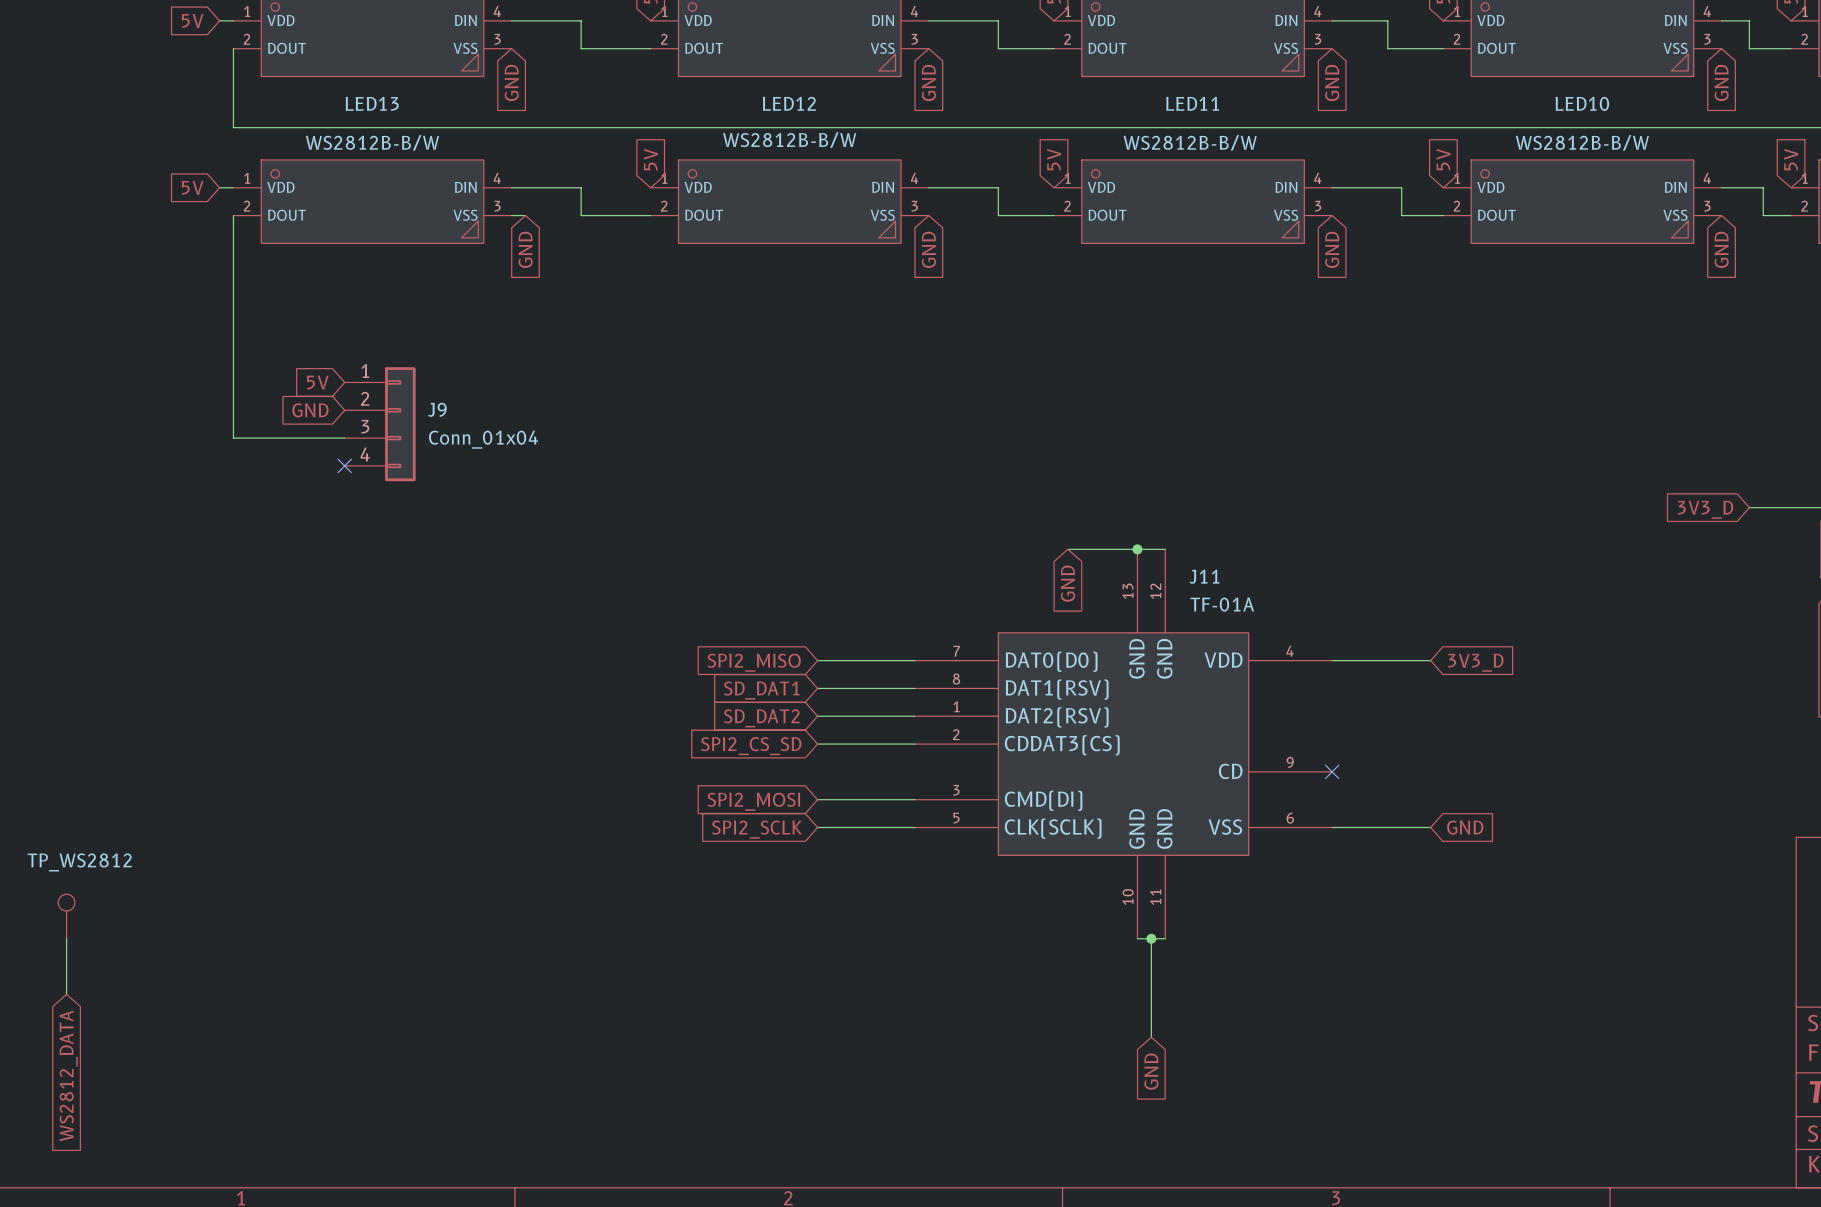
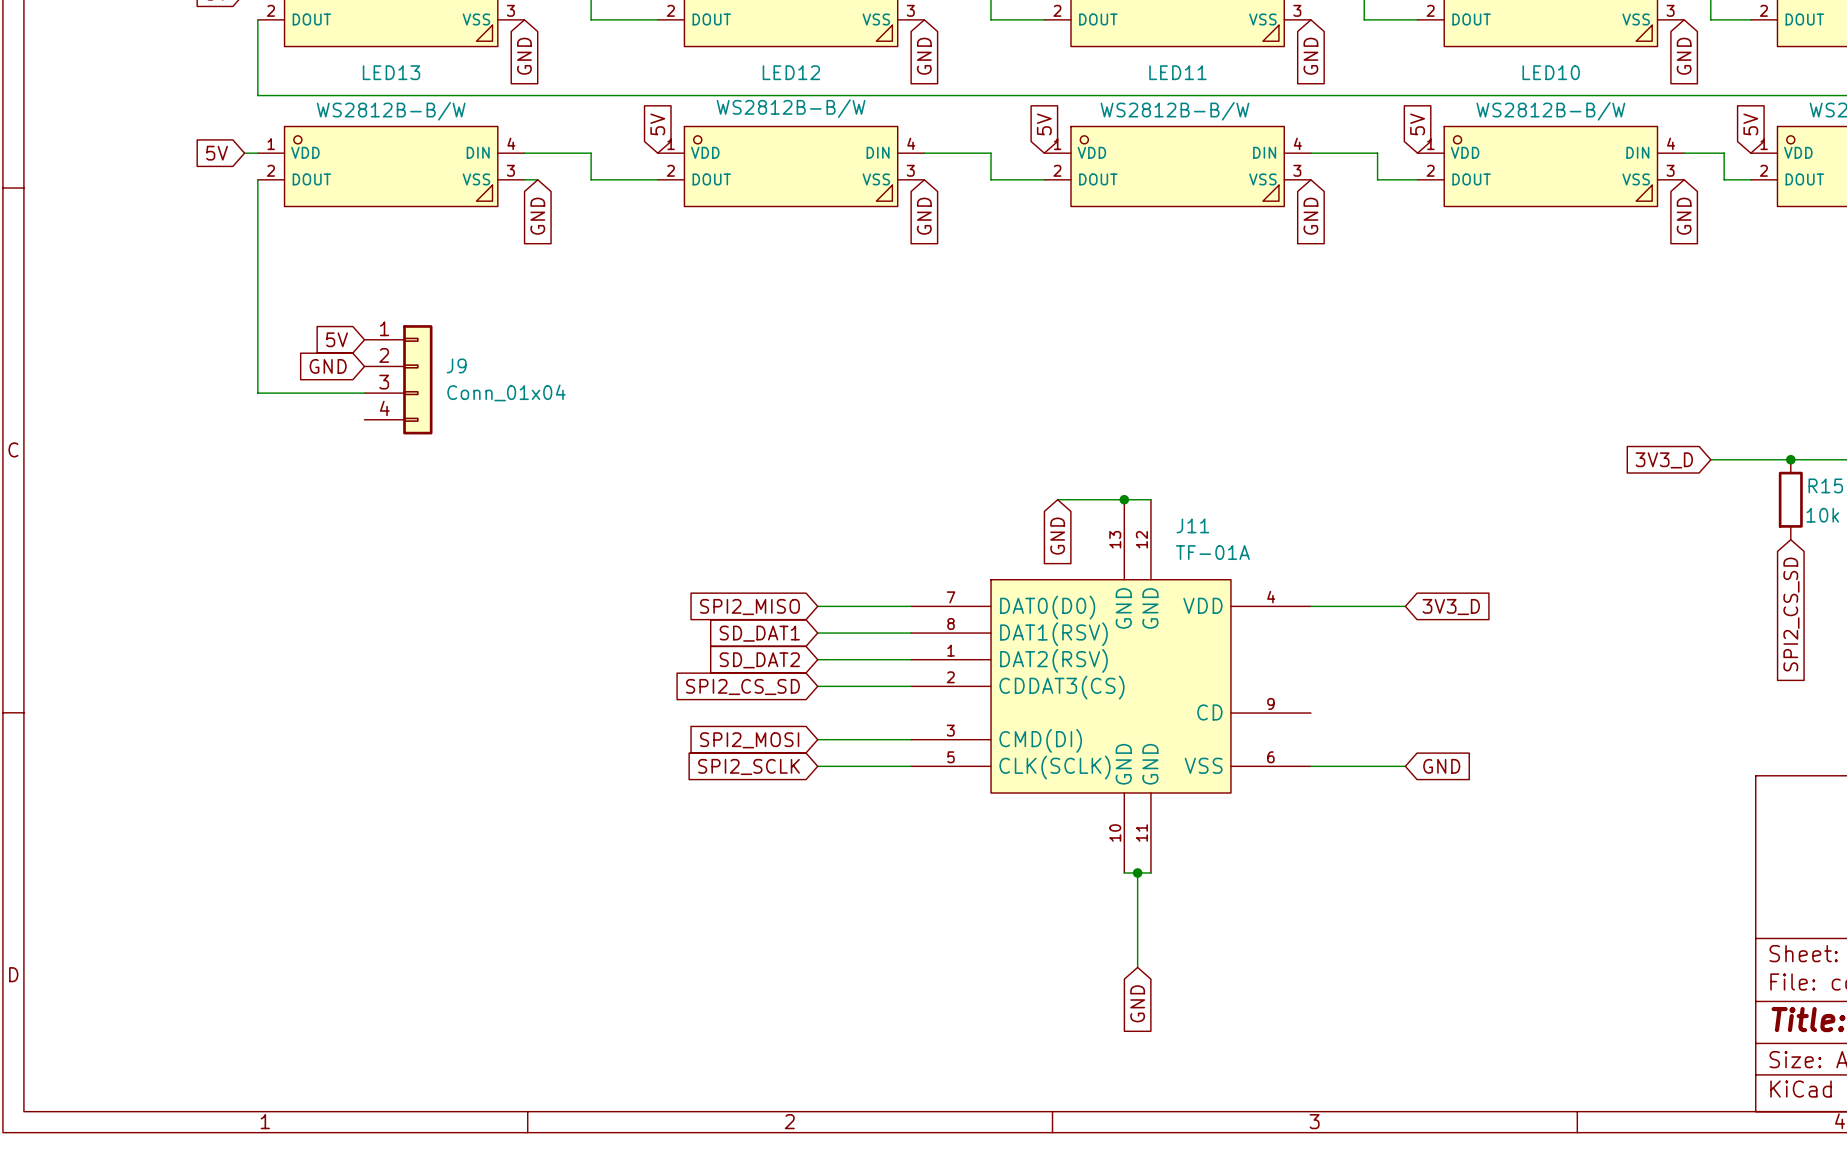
no-connect mark: (344, 465) -> none
no-connect mark: (1332, 771) -> none
TP_WS2812: (66, 916) -> none
wire: (66, 938) (66, 994) -> none
global label: WS2812_DATA (68, 1075) -> none

